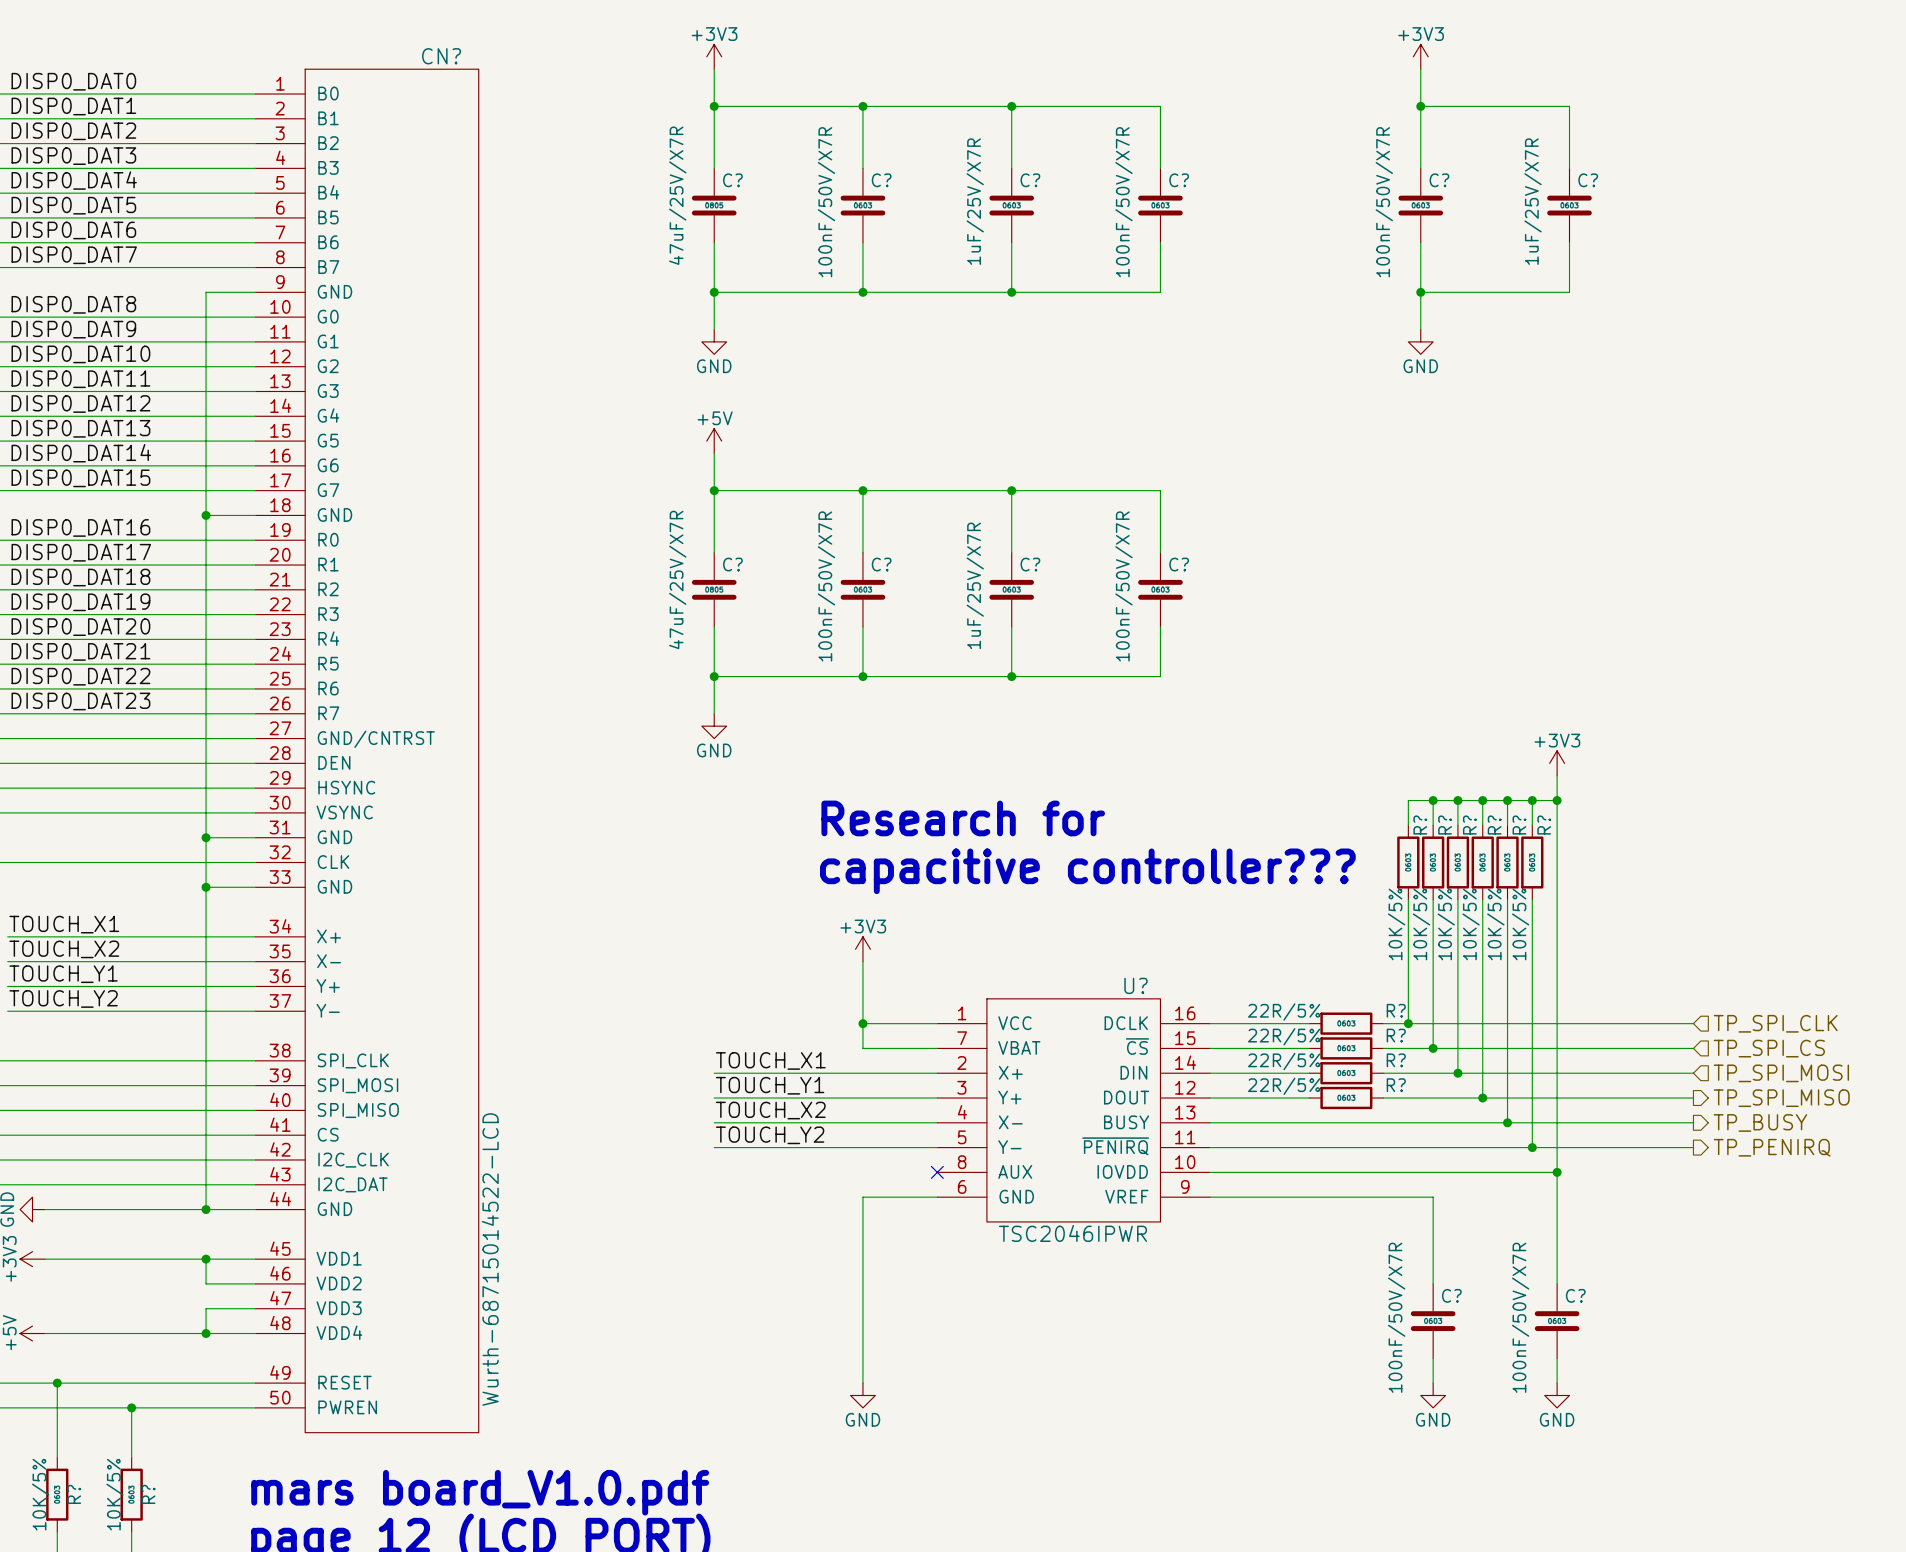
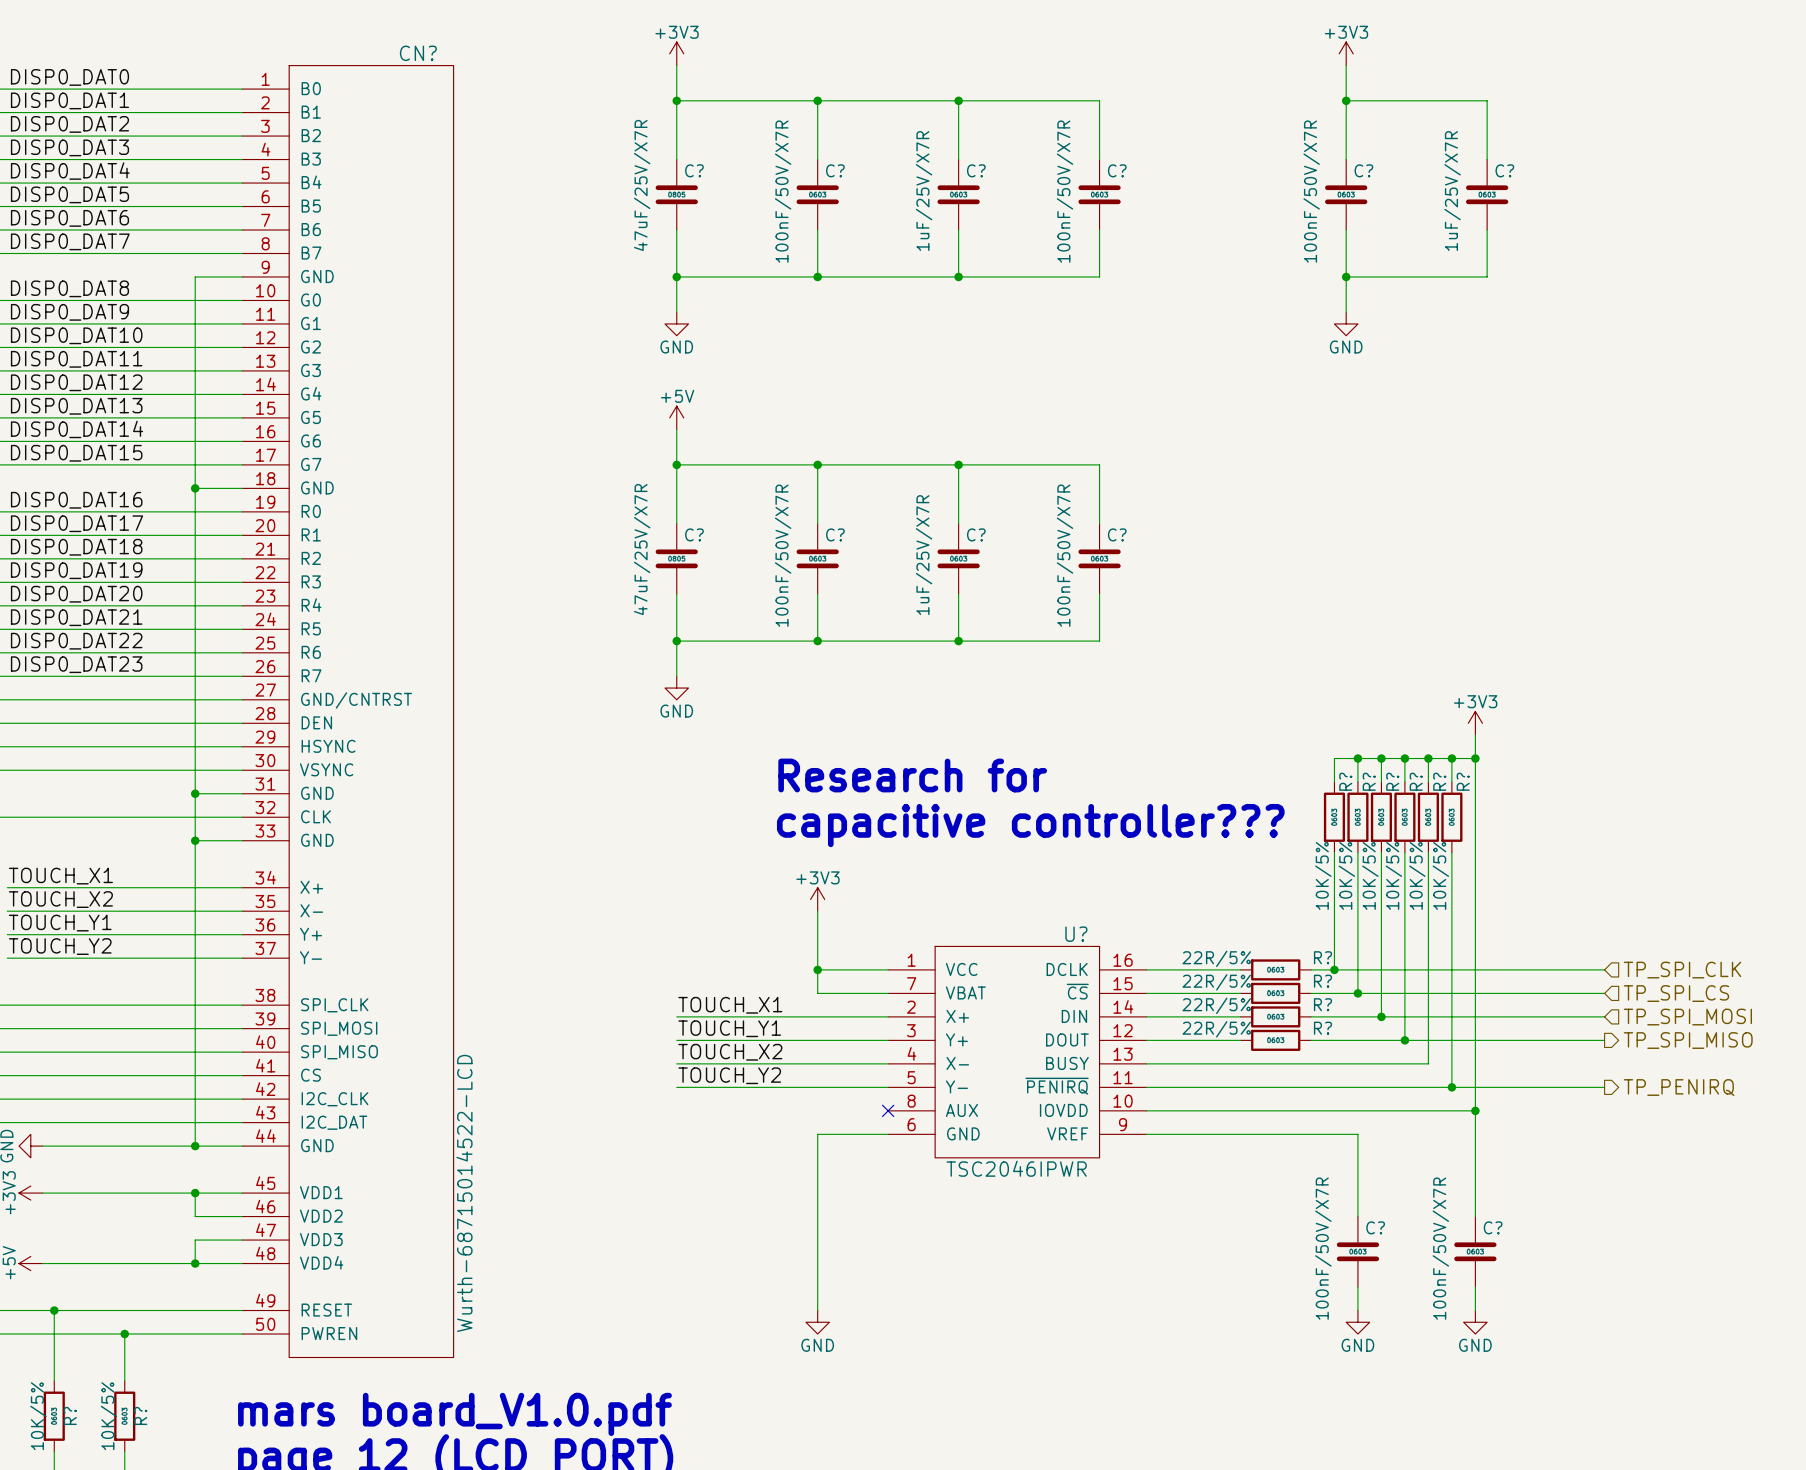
wire: (1507, 1122) (1693, 1122) -> none
junction: (1507, 1122) -> none
hierarchical label: TP_BUSY (1760, 1122) -> none

